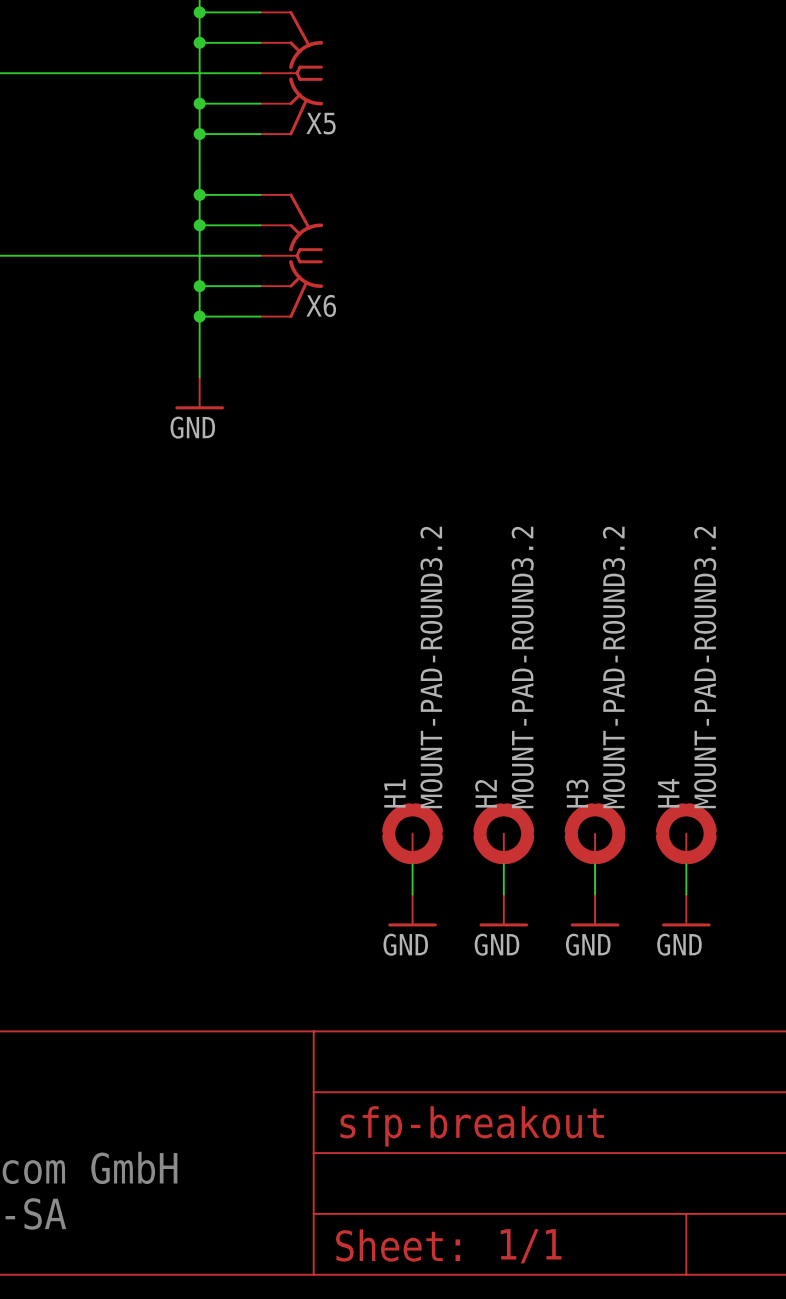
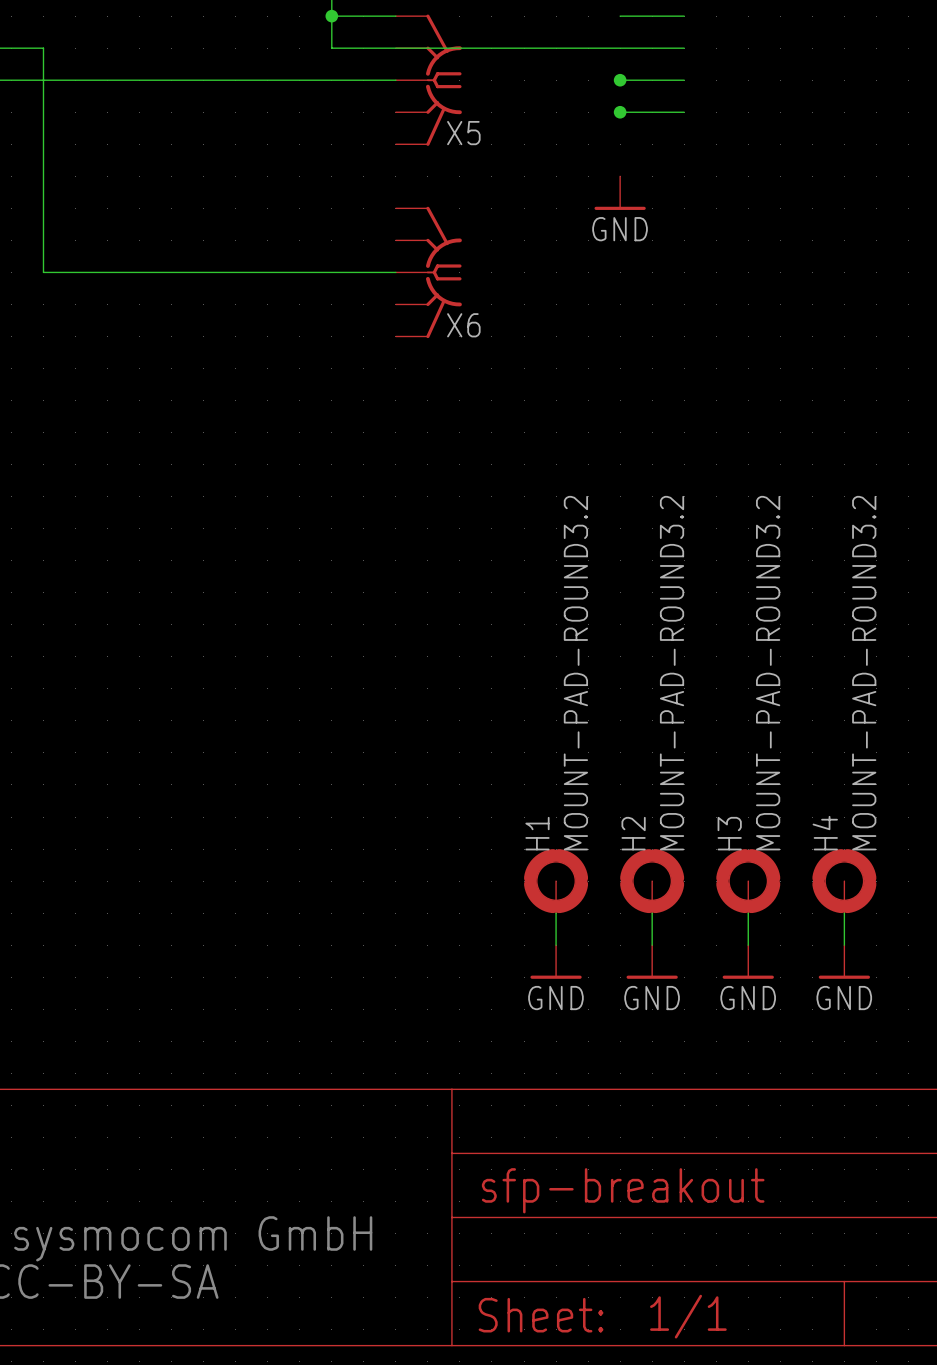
wire: none -> (620, 16) (684, 16)
wire: (199, 42) (199, 377) -> none
junction: (199, 42) -> none
wire: none -> (395, 48) (684, 48)
junction: none -> (620, 80)
wire: (199, 103) (260, 103) -> (620, 80) (684, 80)
junction: (199, 103) -> none
junction: none -> (620, 112)
wire: (199, 134) (260, 134) -> (620, 112) (684, 112)
junction: (199, 134) -> none
power symbol: none -> GND (620, 193)
wire: (199, 194) (260, 194) -> none
junction: (199, 194) -> none
wire: (199, 225) (260, 225) -> none
junction: (199, 225) -> none
wire: (199, 286) (260, 286) -> none
junction: (199, 286) -> none
wire: (199, 316) (260, 316) -> none
junction: (199, 316) -> none
power symbol: GND (199, 393) -> none

